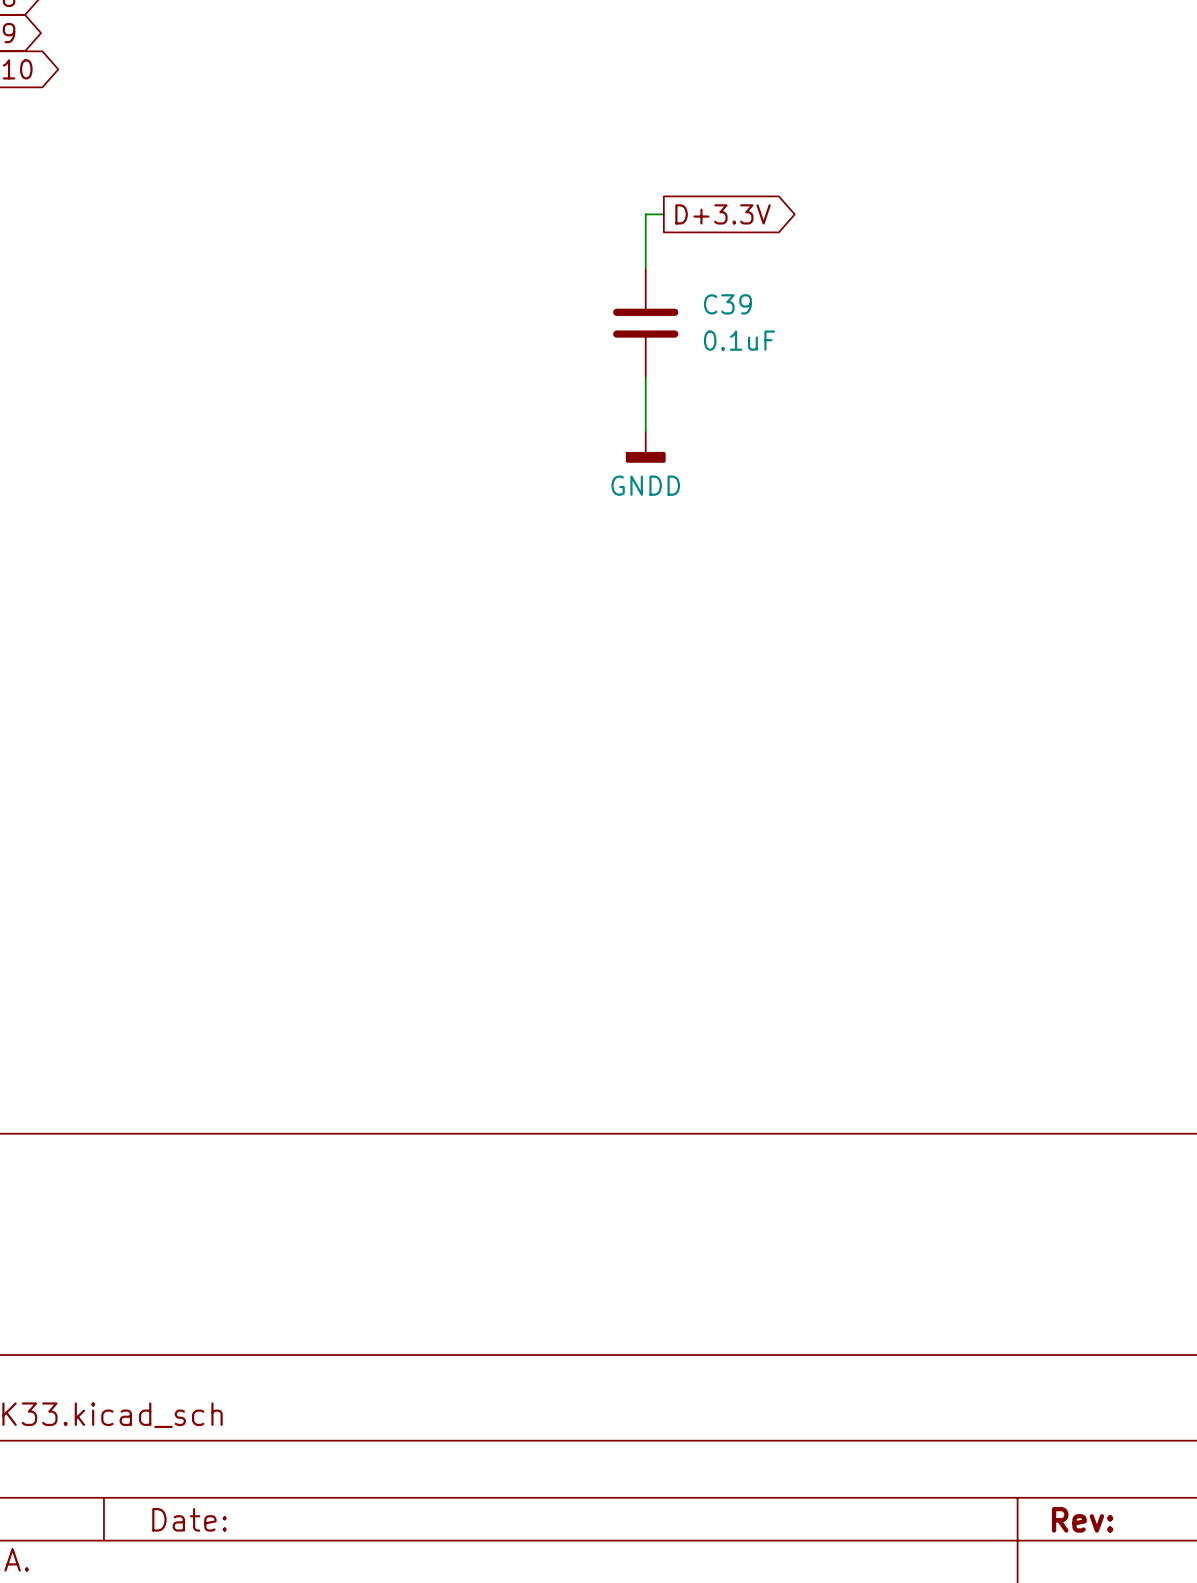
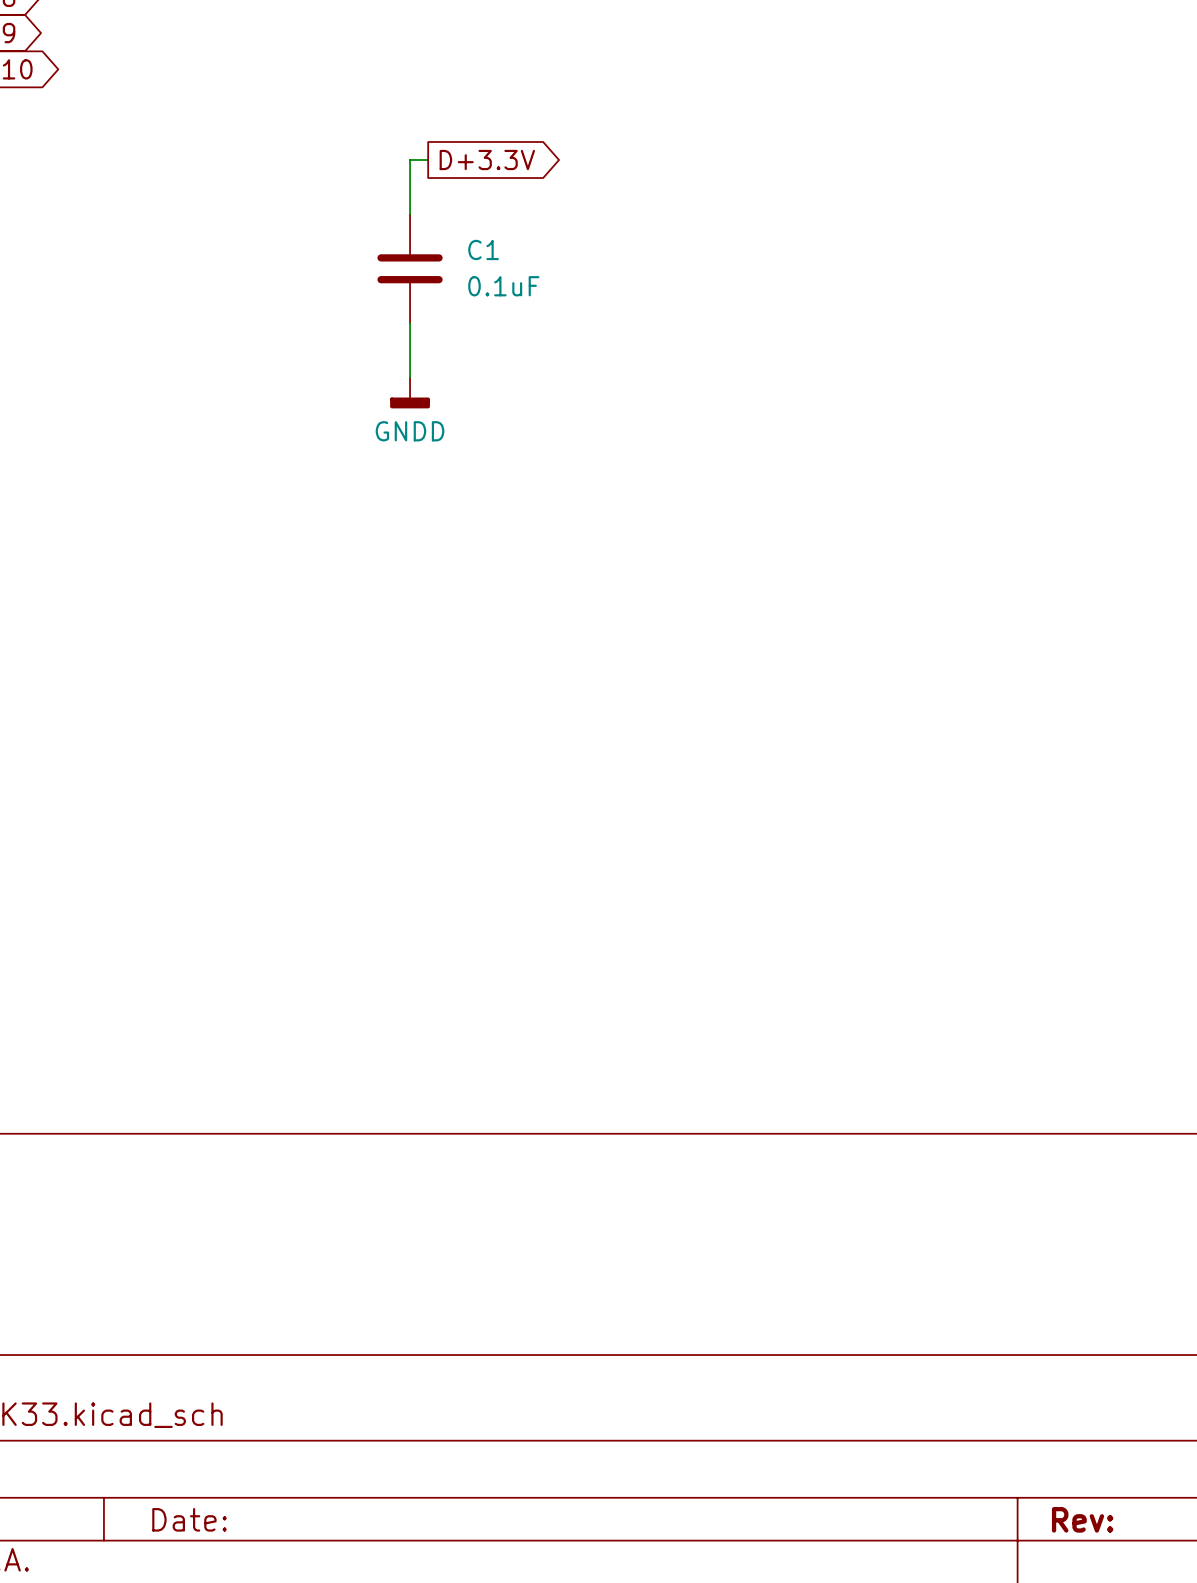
wire: (663, 214) (645, 214) (645, 268) -> (428, 160) (410, 160) (410, 214)
global label position: D+3.3V (723, 214) -> D+3.3V (487, 160)
C1: none -> 0.1uF (410, 268)
C39: 0.1uF (645, 323) -> none
wire: (645, 377) (645, 431) -> (410, 323) (410, 377)
power symbol position: GNDD (645, 447) -> GNDD (410, 392)

